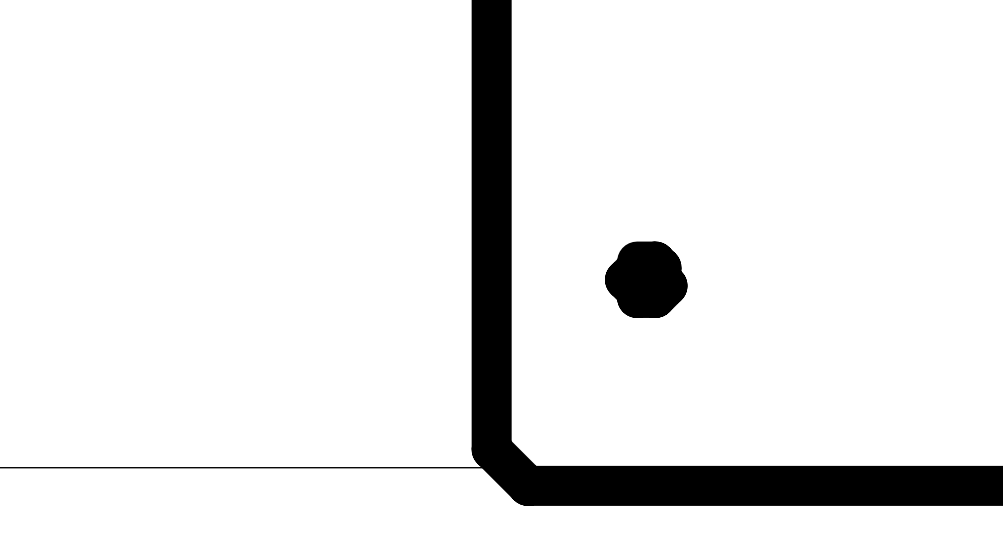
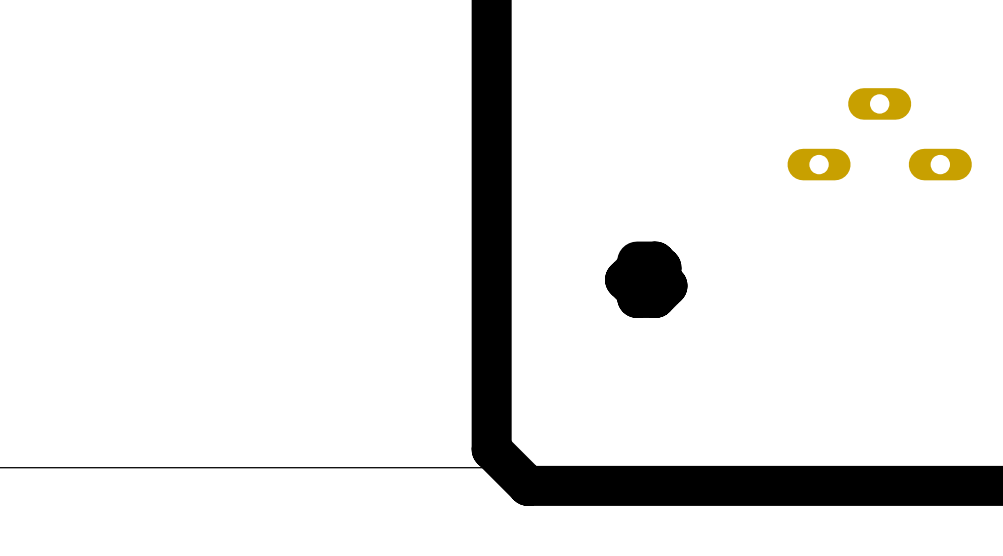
part: none -> (879, 134)

